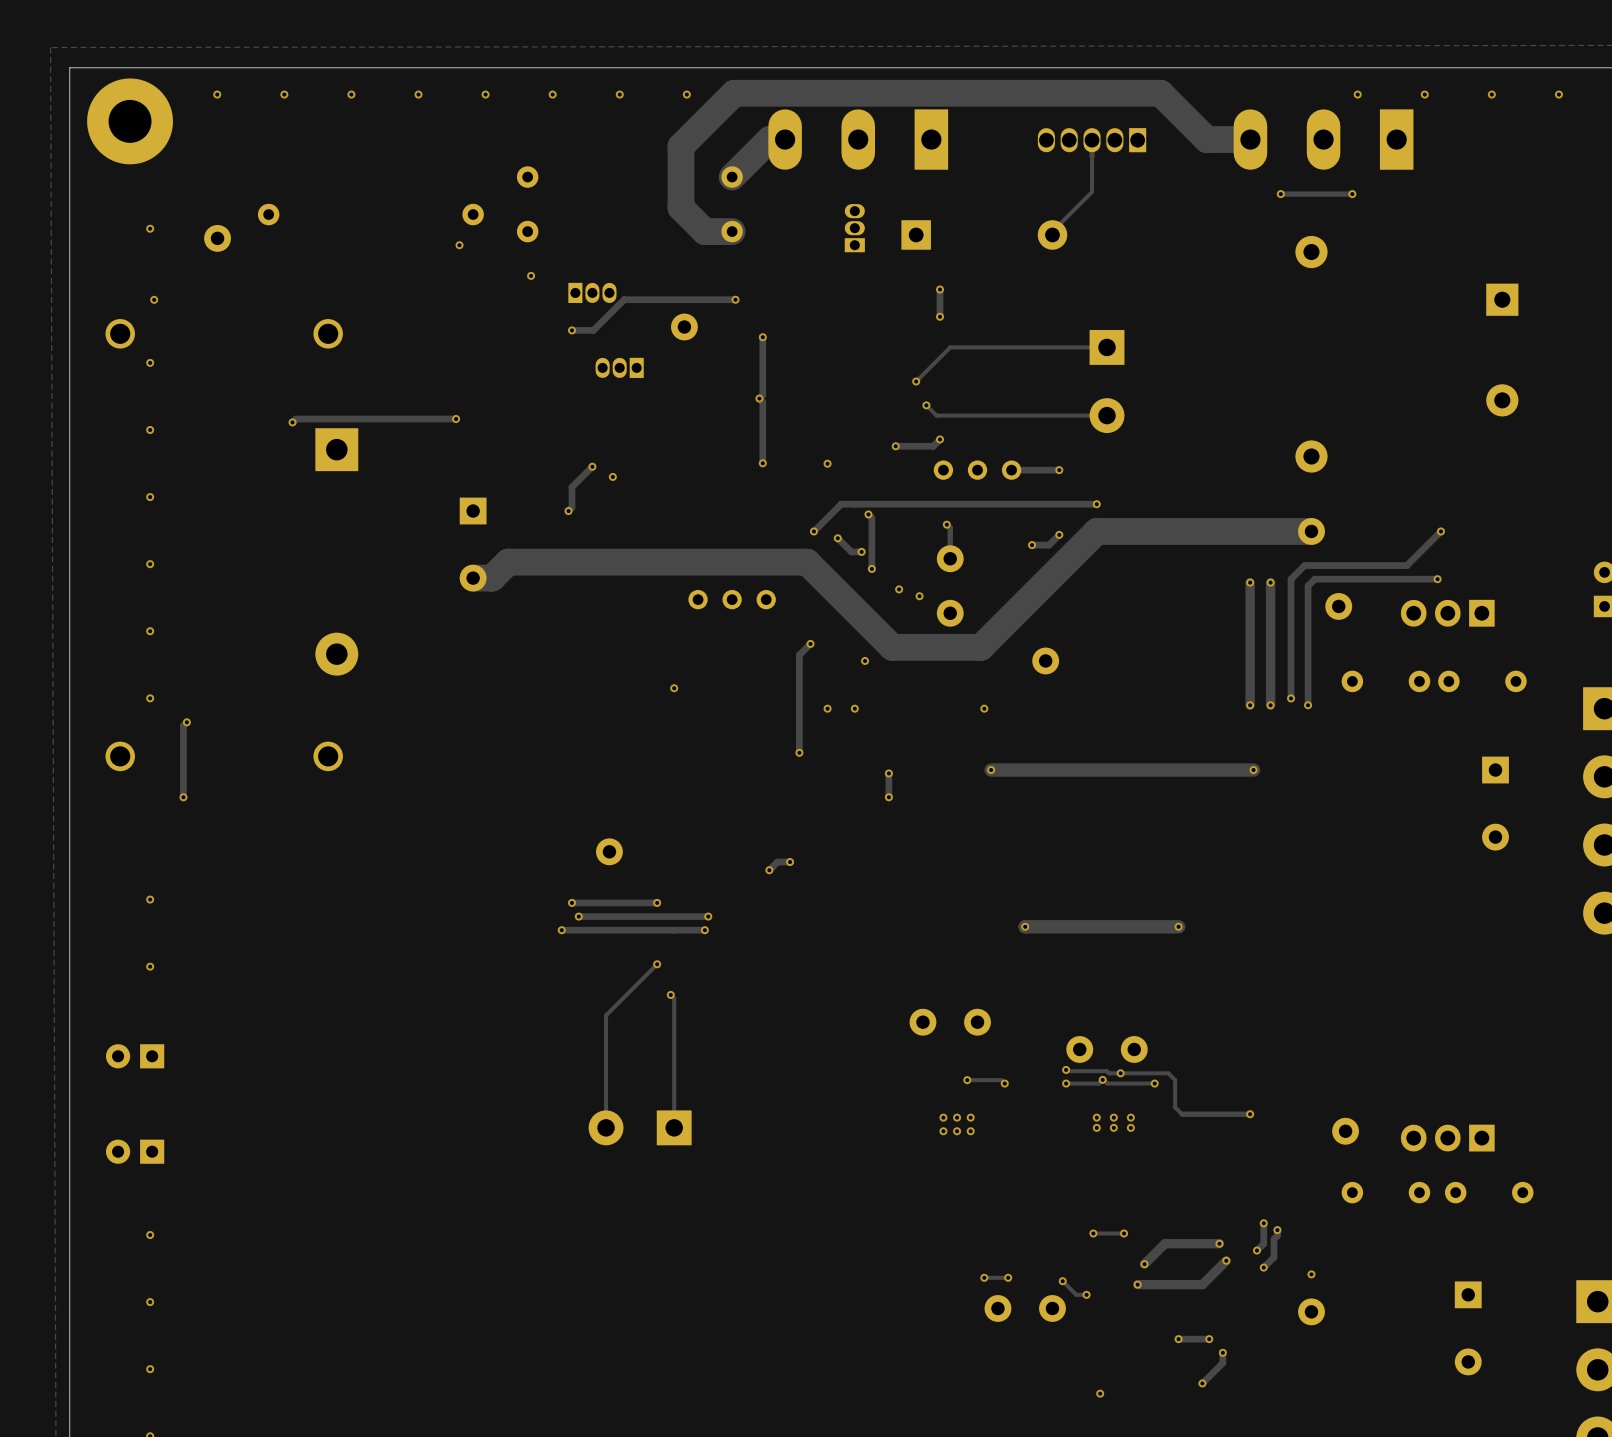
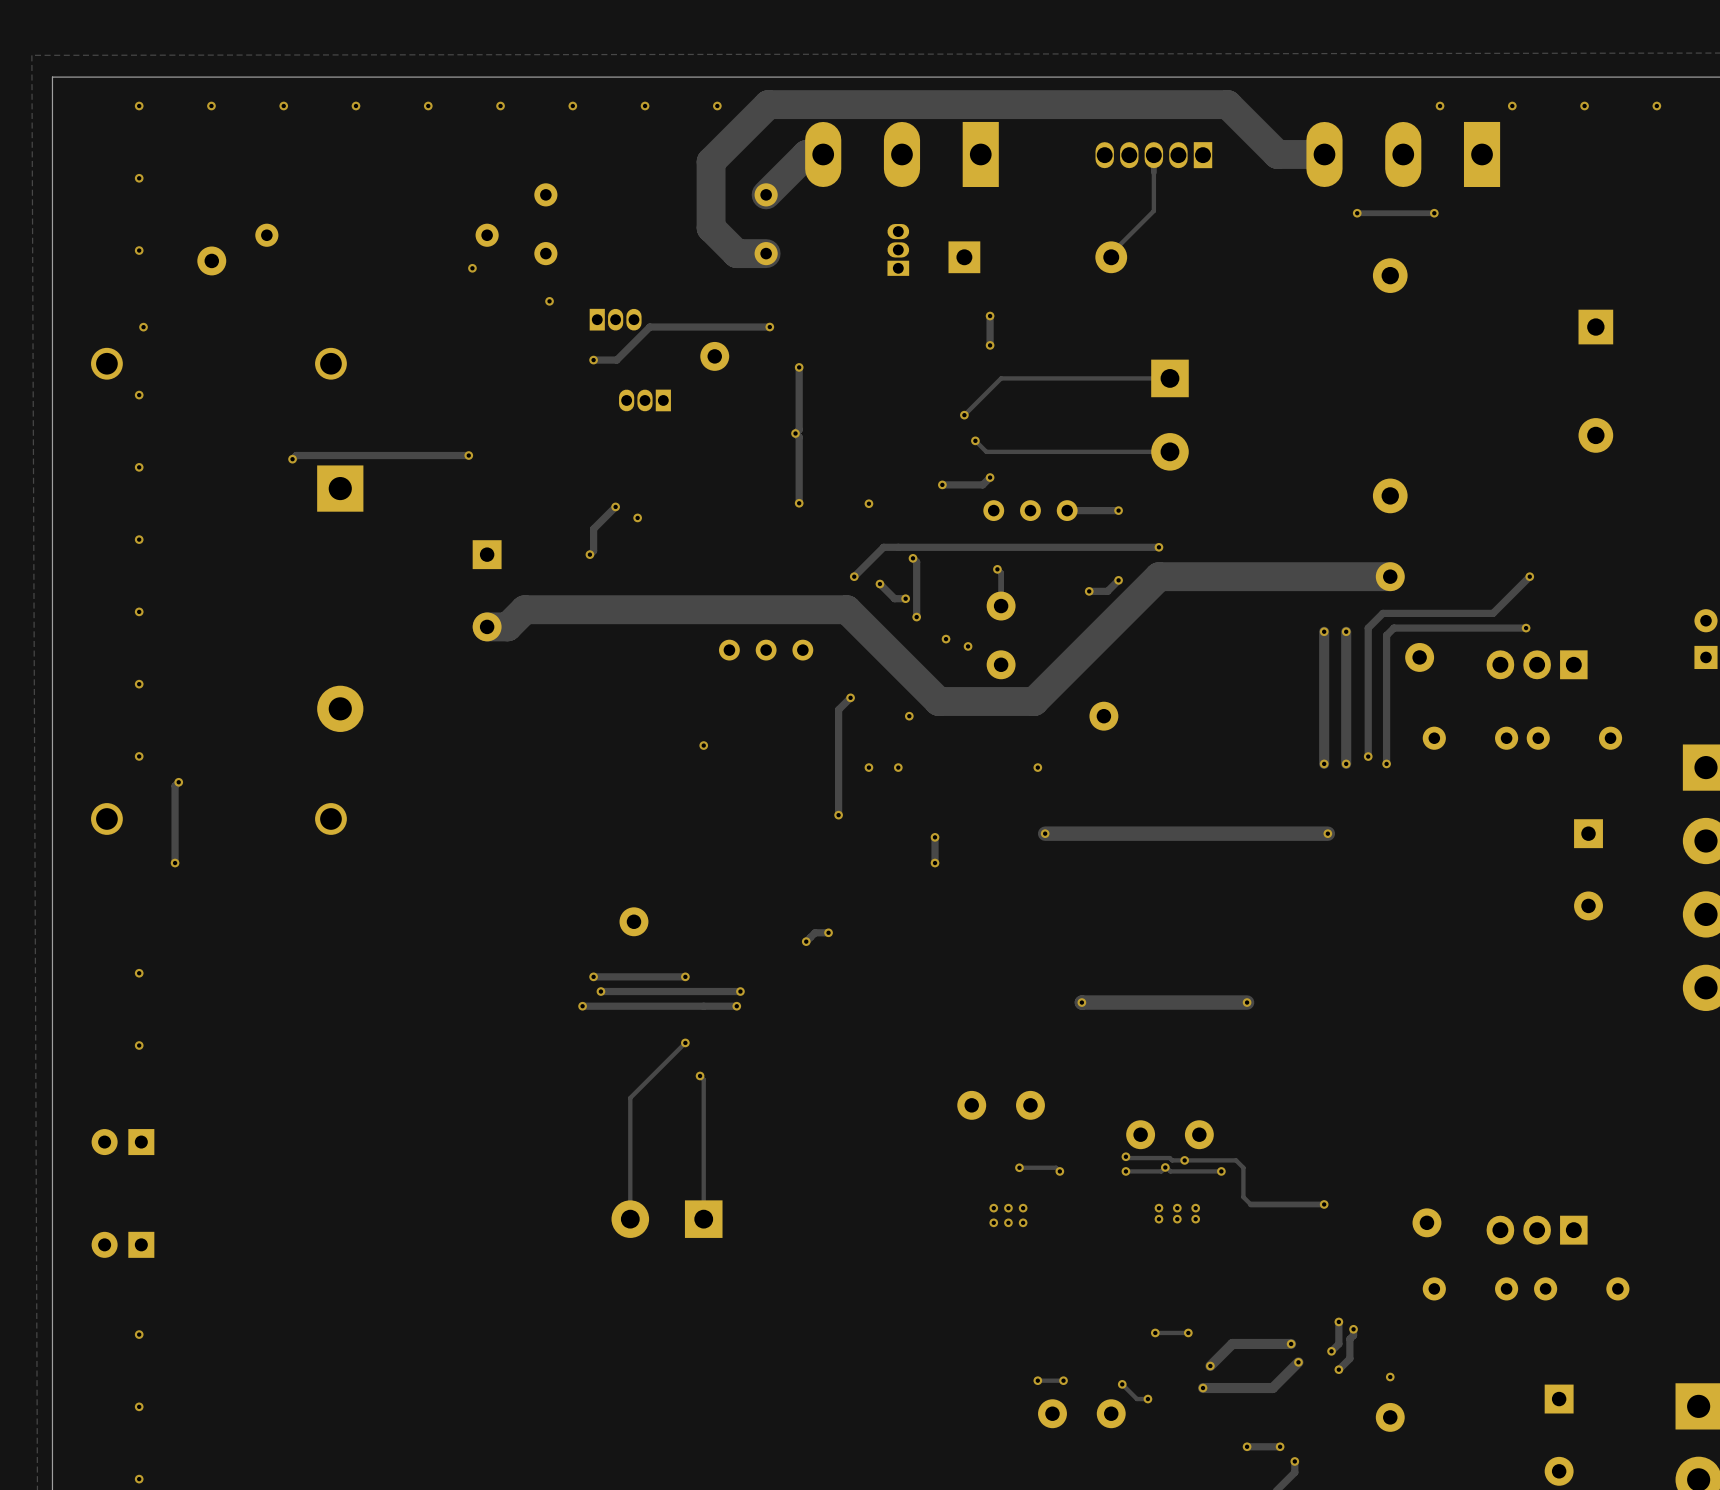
via: none -> (139, 106)
part: (130, 121) -> none
via: none -> (139, 178)

